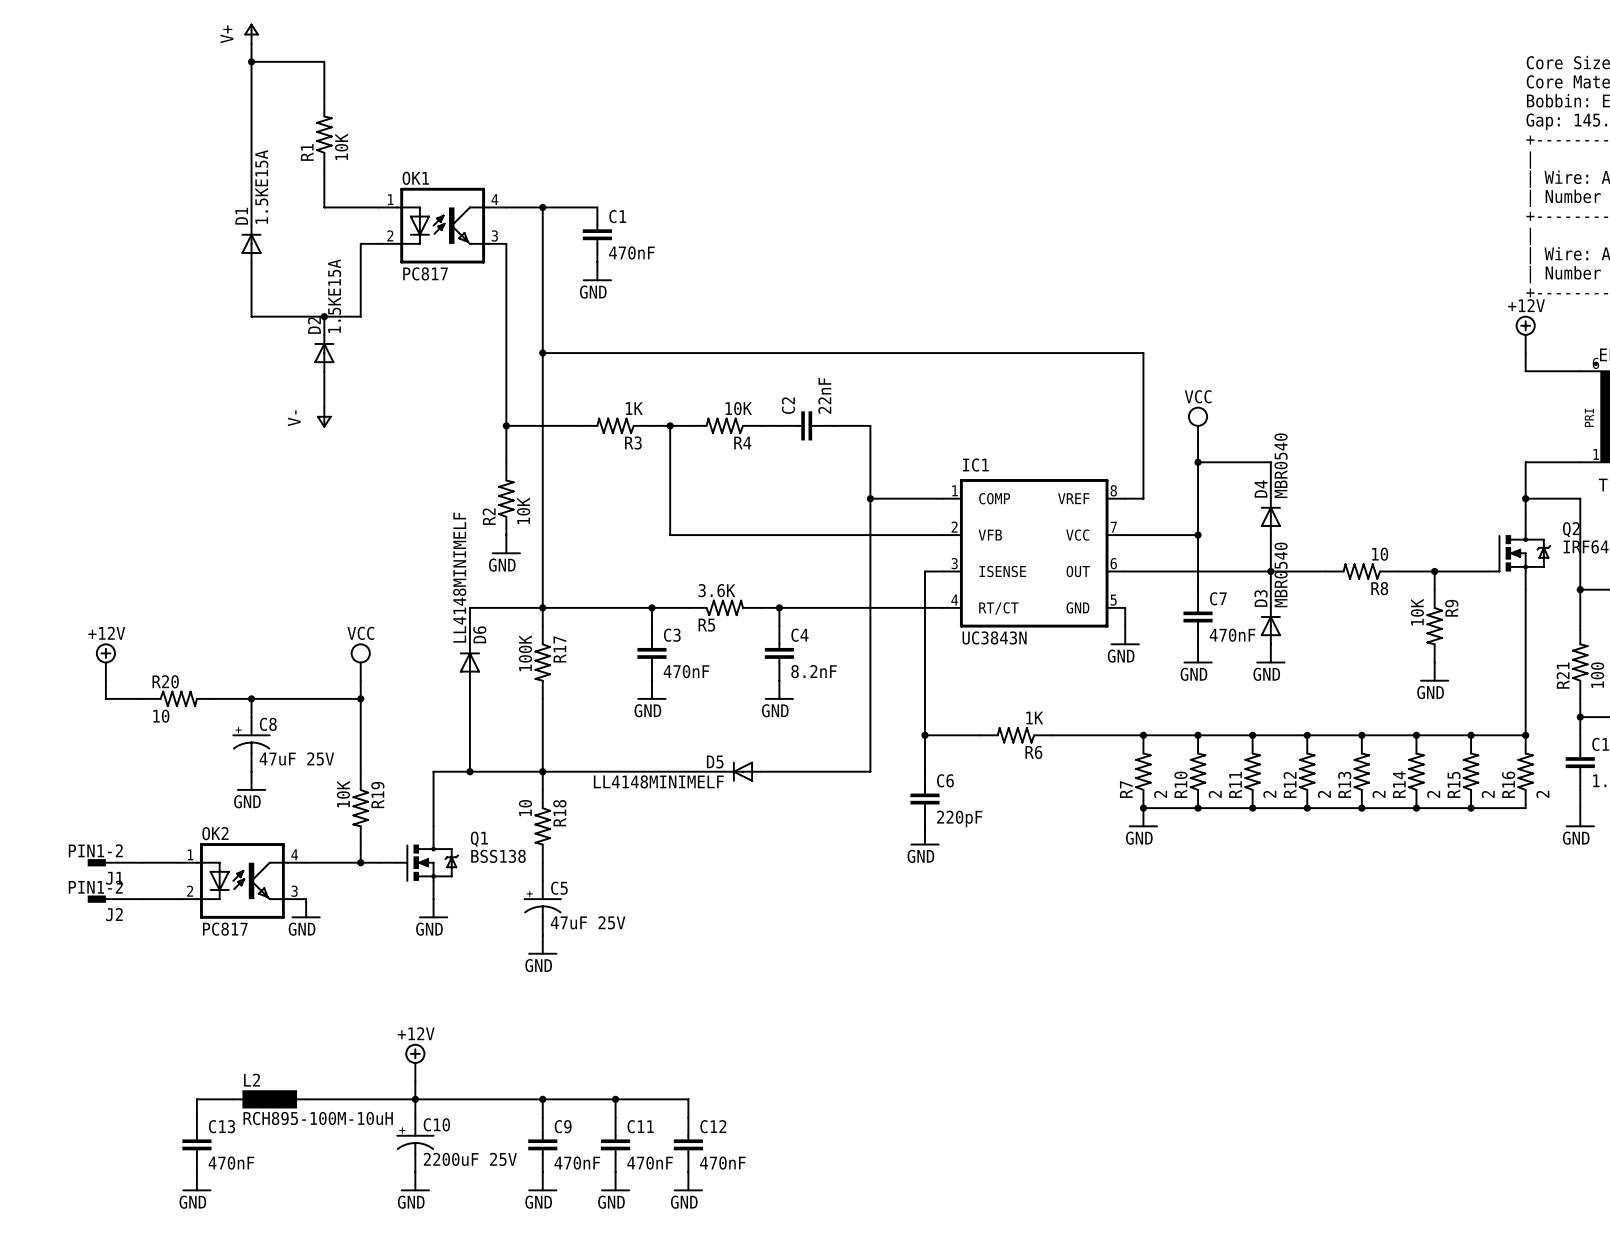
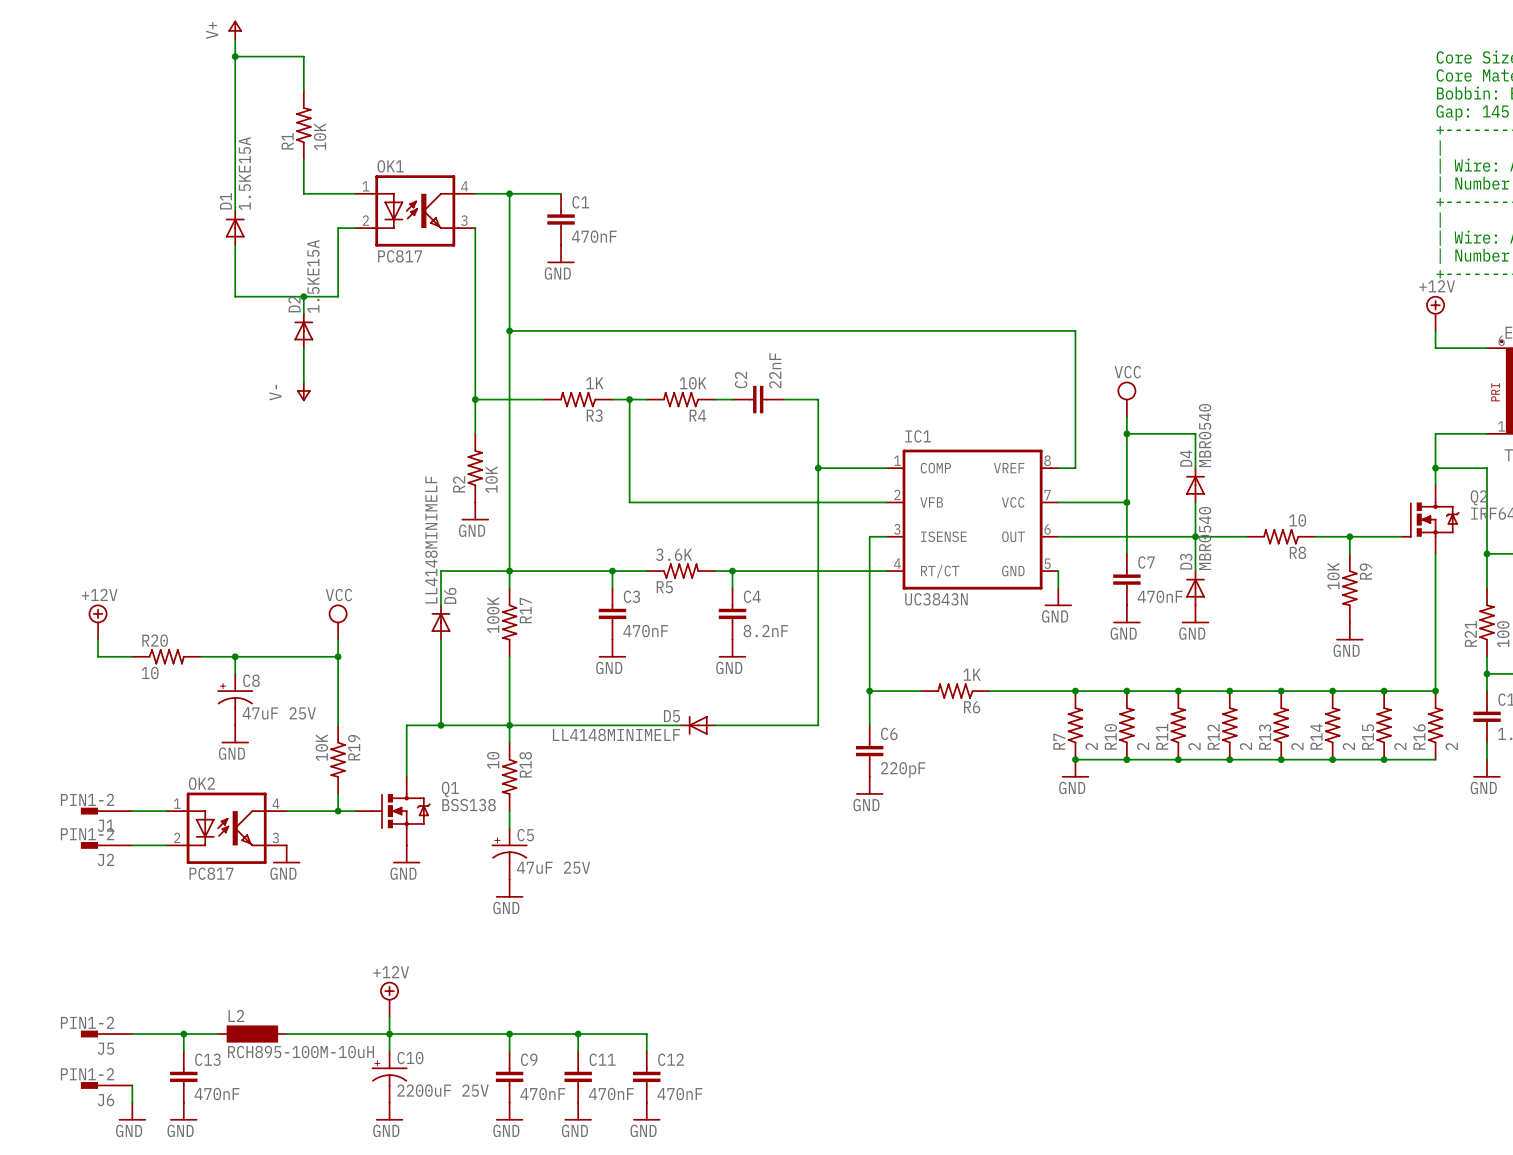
J5: none -> PIN1-2 (106, 1034)
wire: none -> (132, 1034) (183, 1034)
junction: none -> (183, 1034)
J6: none -> PIN1-2 (106, 1085)
wire: none -> (132, 1085) (132, 1102)
power symbol: none -> GND (132, 1111)

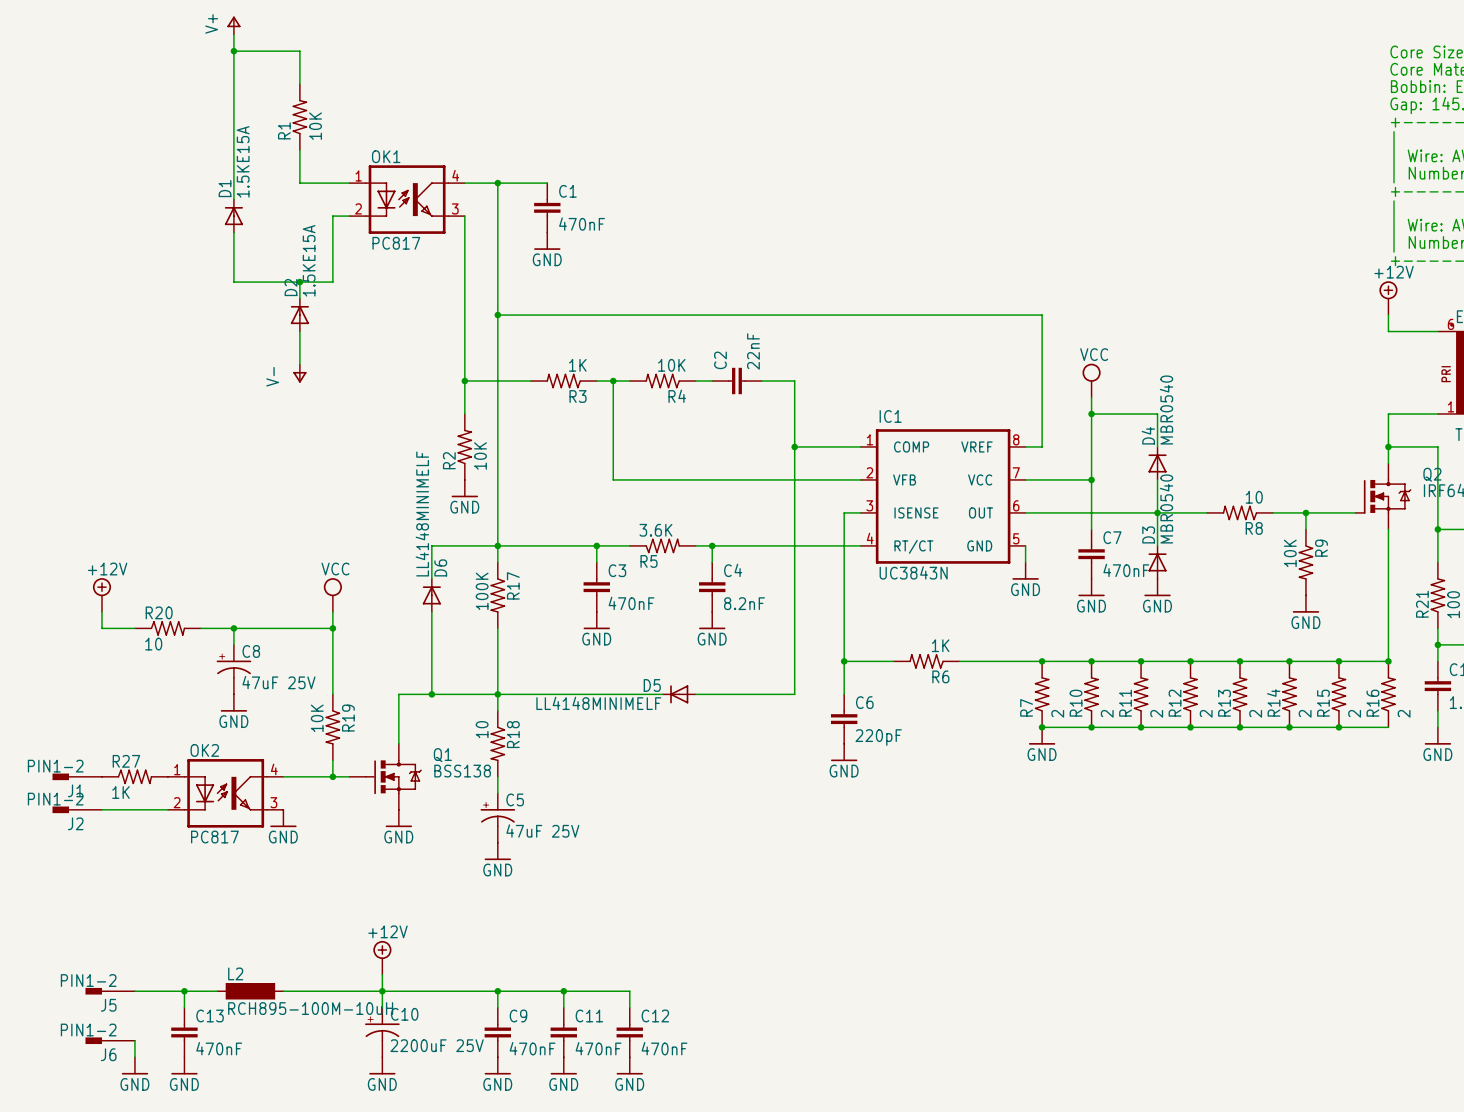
J1 position: (106, 811) -> (77, 776)
R27: none -> 1K (134, 776)
J2 position: (106, 845) -> (77, 809)

